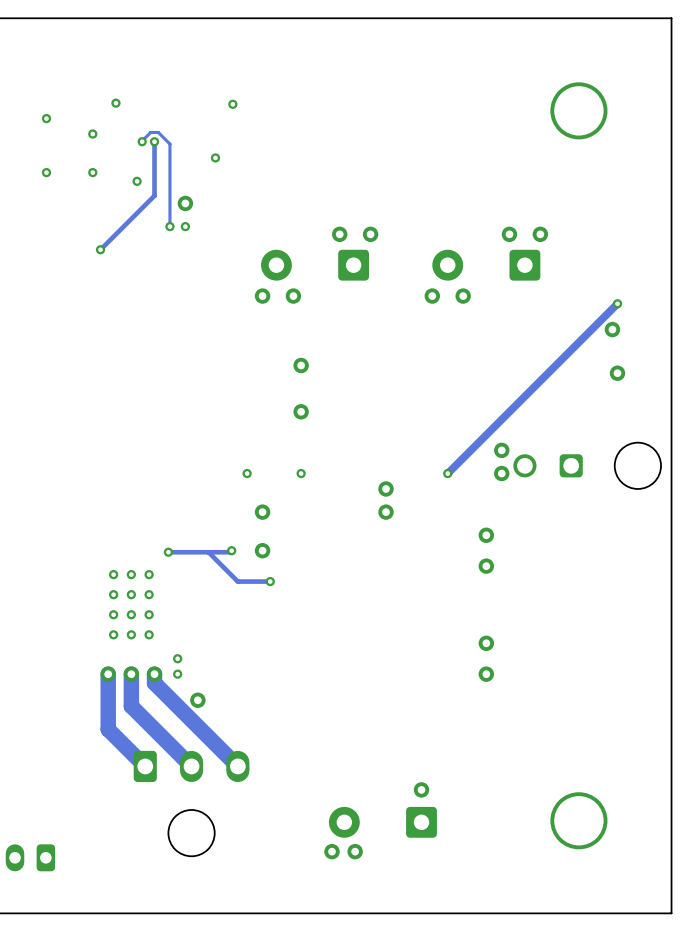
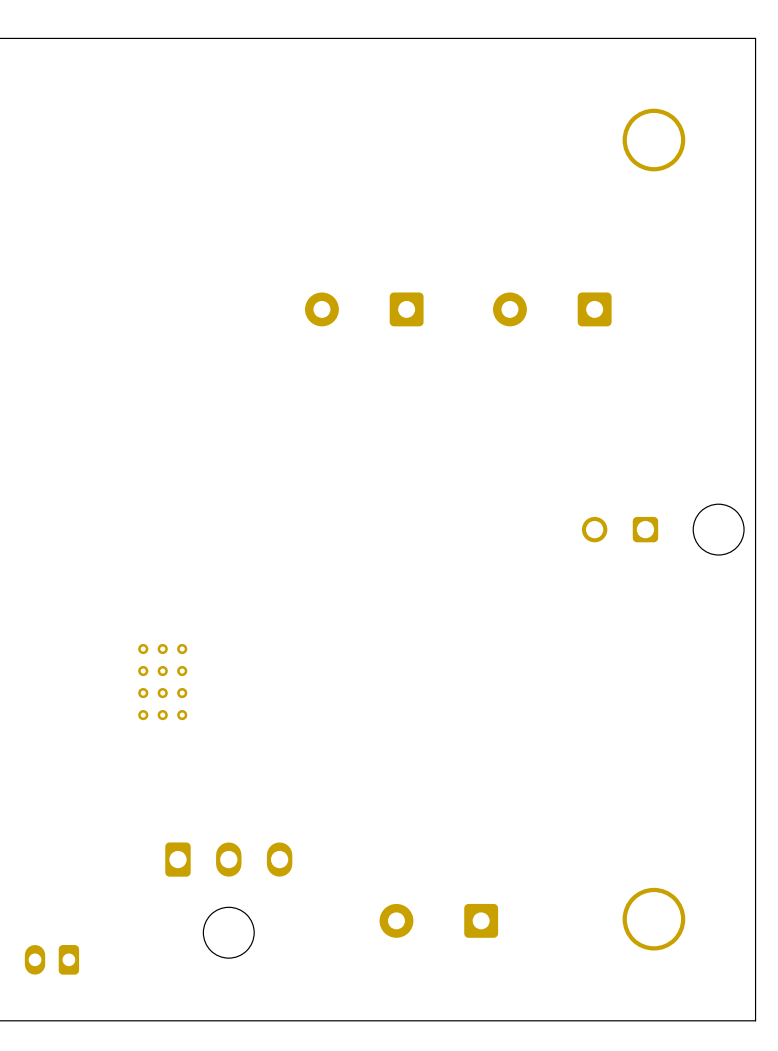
via: (115, 103) -> none
via: (232, 104) -> none
via: (46, 118) -> none
via: (92, 134) -> none
track: (142, 141) (150, 132) (158, 132) (169, 144) (169, 226) -> none
via: (142, 141) -> none
track: (154, 141) (154, 195) (100, 249) -> none
via: (154, 141) -> none
via: (215, 157) -> none
via: (46, 172) -> none
via: (92, 172) -> none
via: (137, 181) -> none
via: (185, 203) -> none
via: (169, 226) -> none
via: (185, 226) -> none
via: (339, 234) -> none
via: (370, 234) -> none
via: (509, 234) -> none
via: (540, 234) -> none
via: (100, 249) -> none
via: (262, 296) -> none
via: (293, 296) -> none
via: (432, 296) -> none
via: (463, 296) -> none
track: (617, 303) (447, 473) -> none
via: (617, 303) -> none
via: (612, 329) -> none
via: (301, 365) -> none
via: (617, 373) -> none
via: (301, 411) -> none
via: (501, 450) -> none
via: (247, 473) -> none
via: (301, 473) -> none
via: (447, 473) -> none
via: (501, 473) -> none
via: (386, 488) -> none
via: (262, 512) -> none
via: (386, 512) -> none
via: (486, 535) -> none
track: (231, 550) (230, 552) (168, 552) -> none
via: (231, 550) -> none
via: (262, 550) -> none
via: (168, 552) -> none
track: (208, 552) (237, 581) (270, 581) -> none
via: (486, 566) -> none
via: (270, 581) -> none
via: (486, 643) -> none
via: (177, 658) -> none
track: (108, 674) (108, 729) (145, 766) -> none
via: (108, 674) -> none
track: (131, 674) (131, 706) (191, 766) -> none
via: (131, 674) -> none
track: (154, 674) (154, 683) (237, 766) (237, 757) -> none
via: (154, 674) -> none
via: (177, 674) -> none
via: (486, 674) -> none
via: (197, 700) -> none
via: (421, 789) -> none
via: (332, 851) -> none
via: (355, 851) -> none

